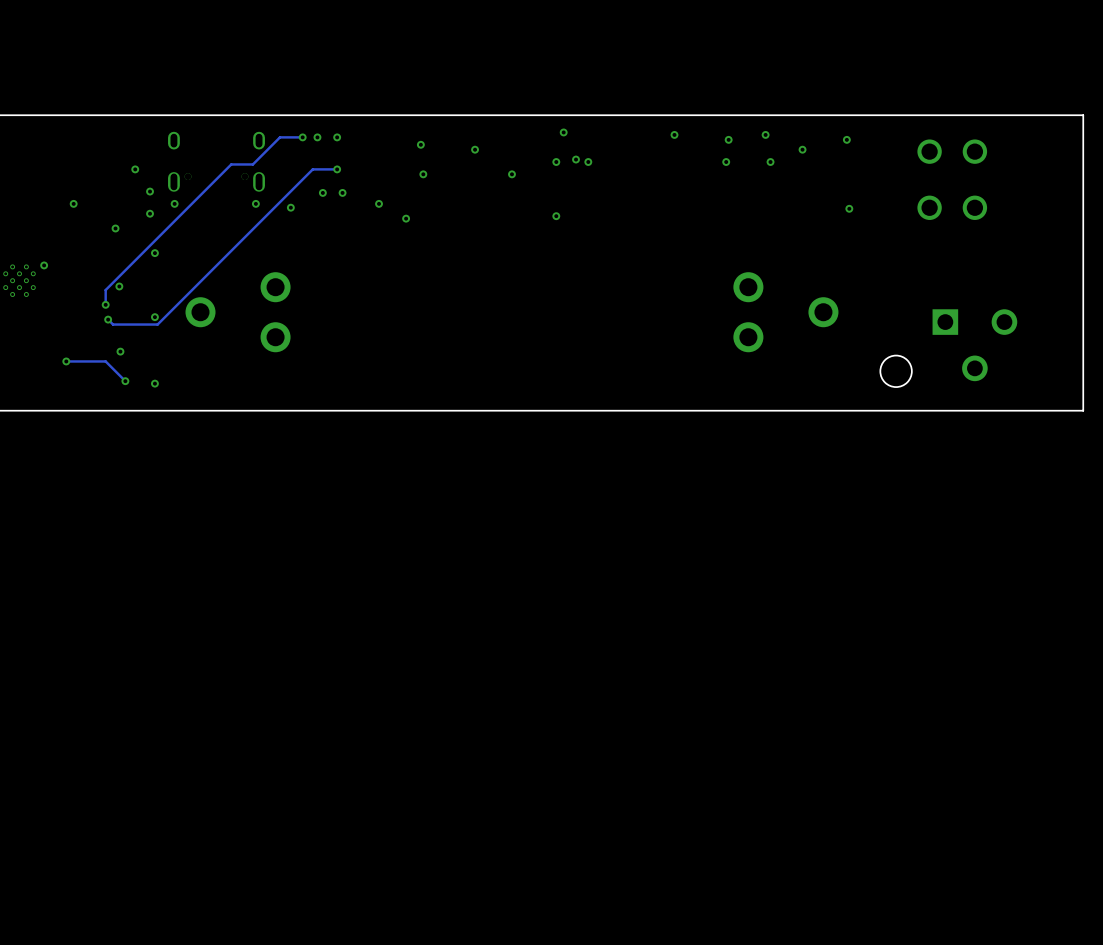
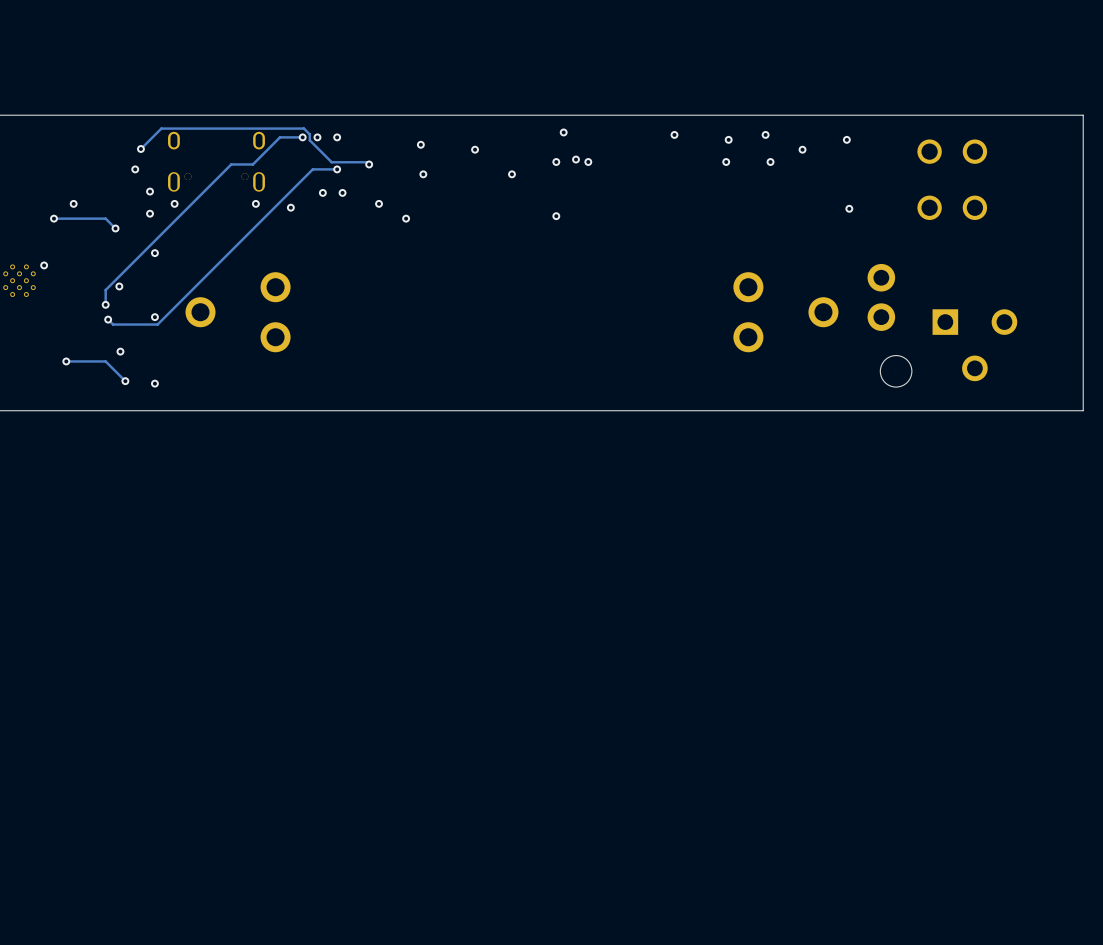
track: none -> (140, 149) (161, 128) (303, 128) (309, 134) (309, 140) (331, 162) (366, 162) (369, 164)
via: none -> (140, 149)
via: none -> (369, 164)
track: none -> (53, 218) (105, 218) (115, 228)
via: none -> (53, 218)
part: none -> (881, 277)
part: none -> (881, 317)

